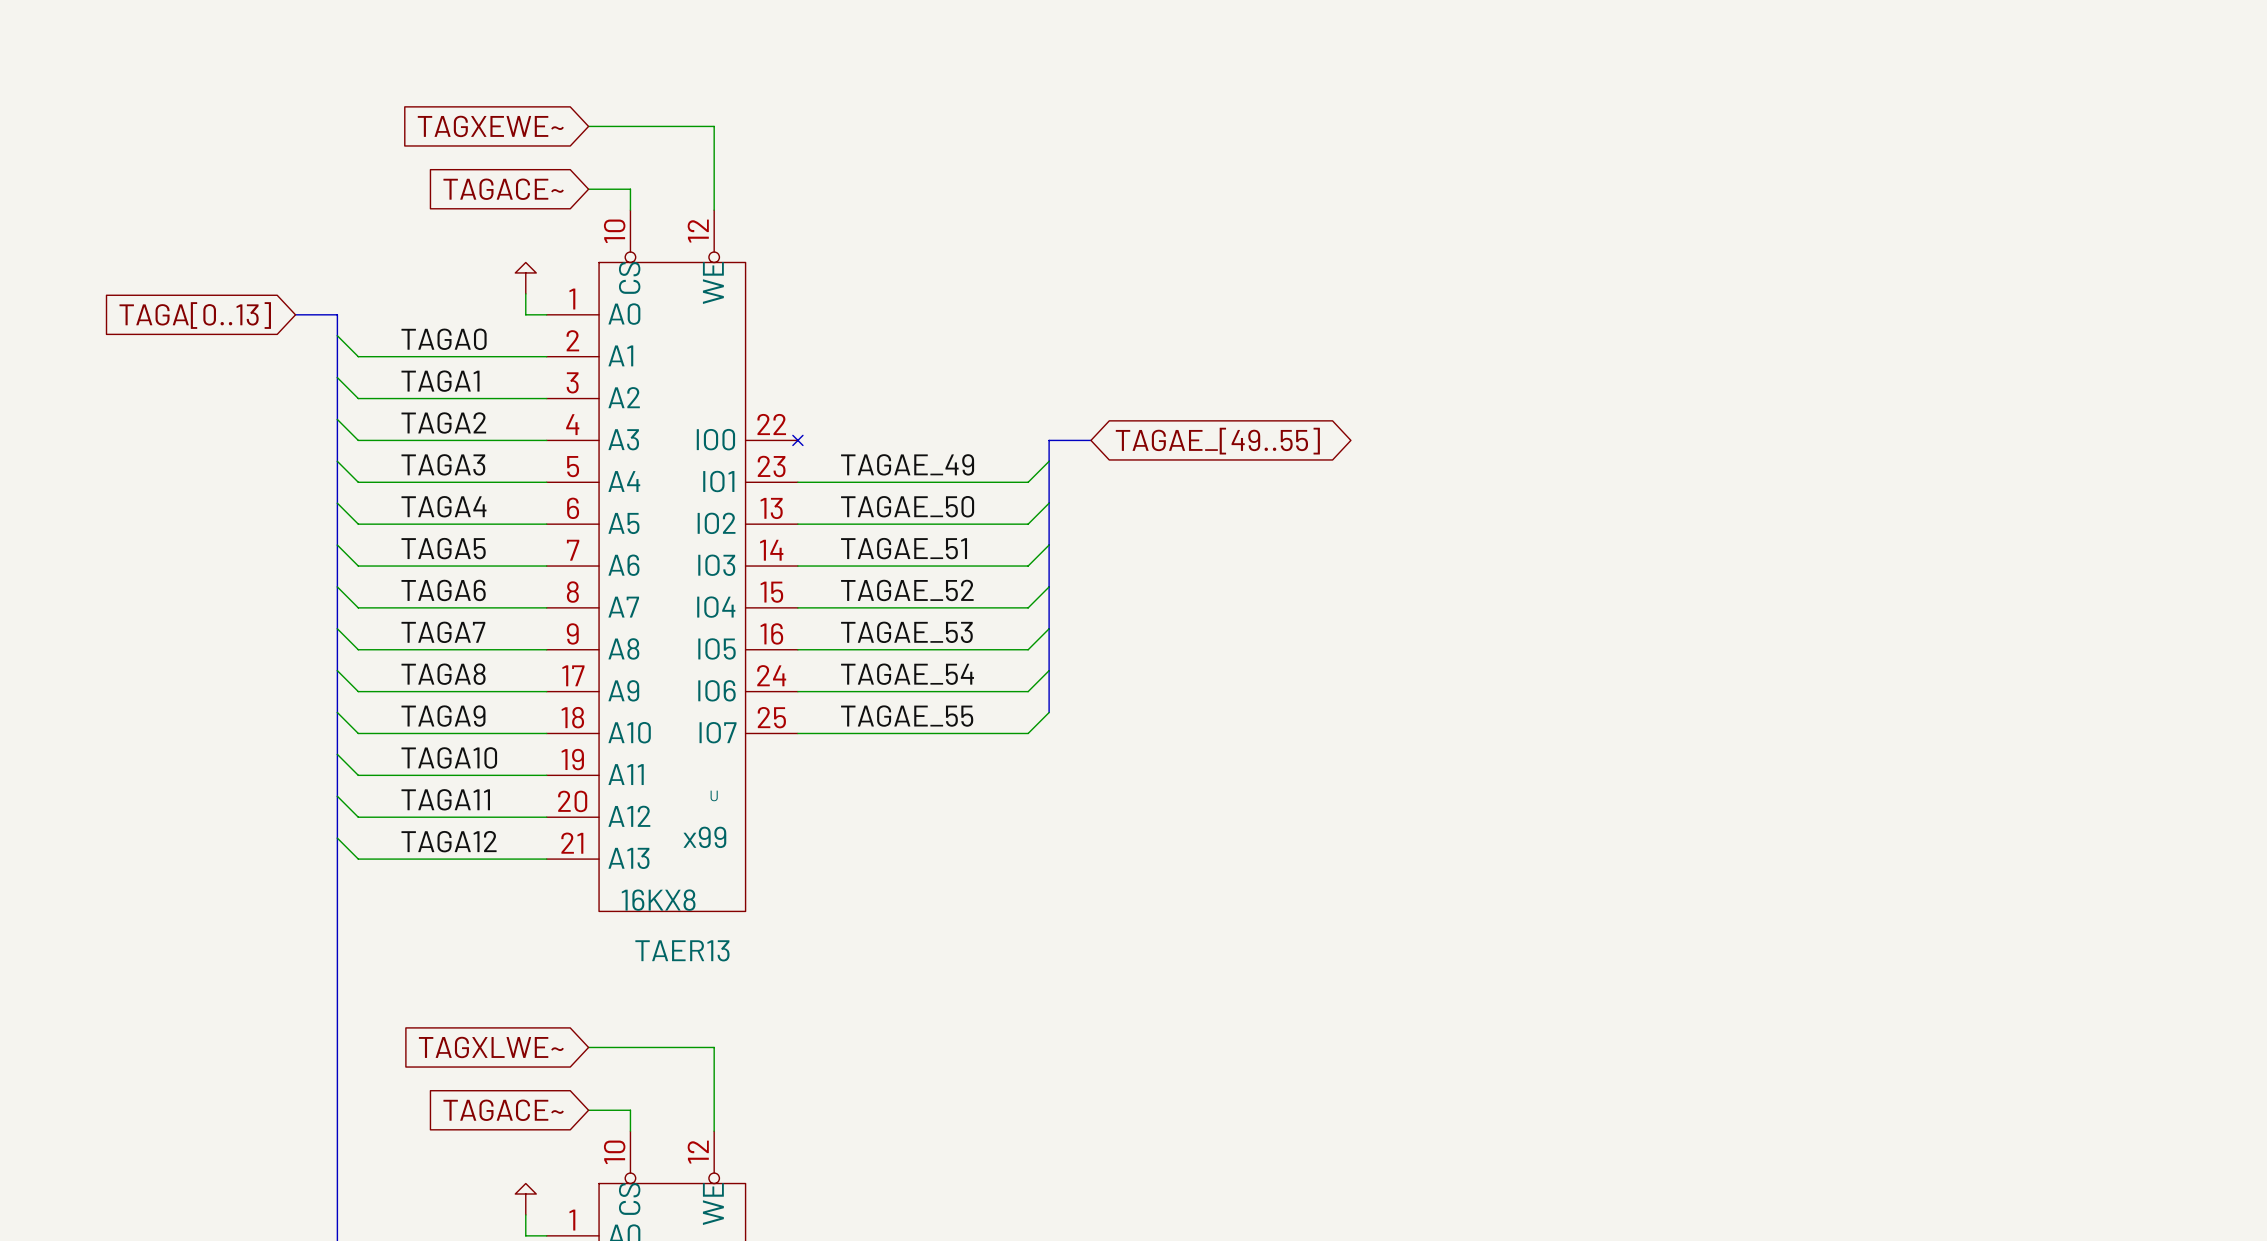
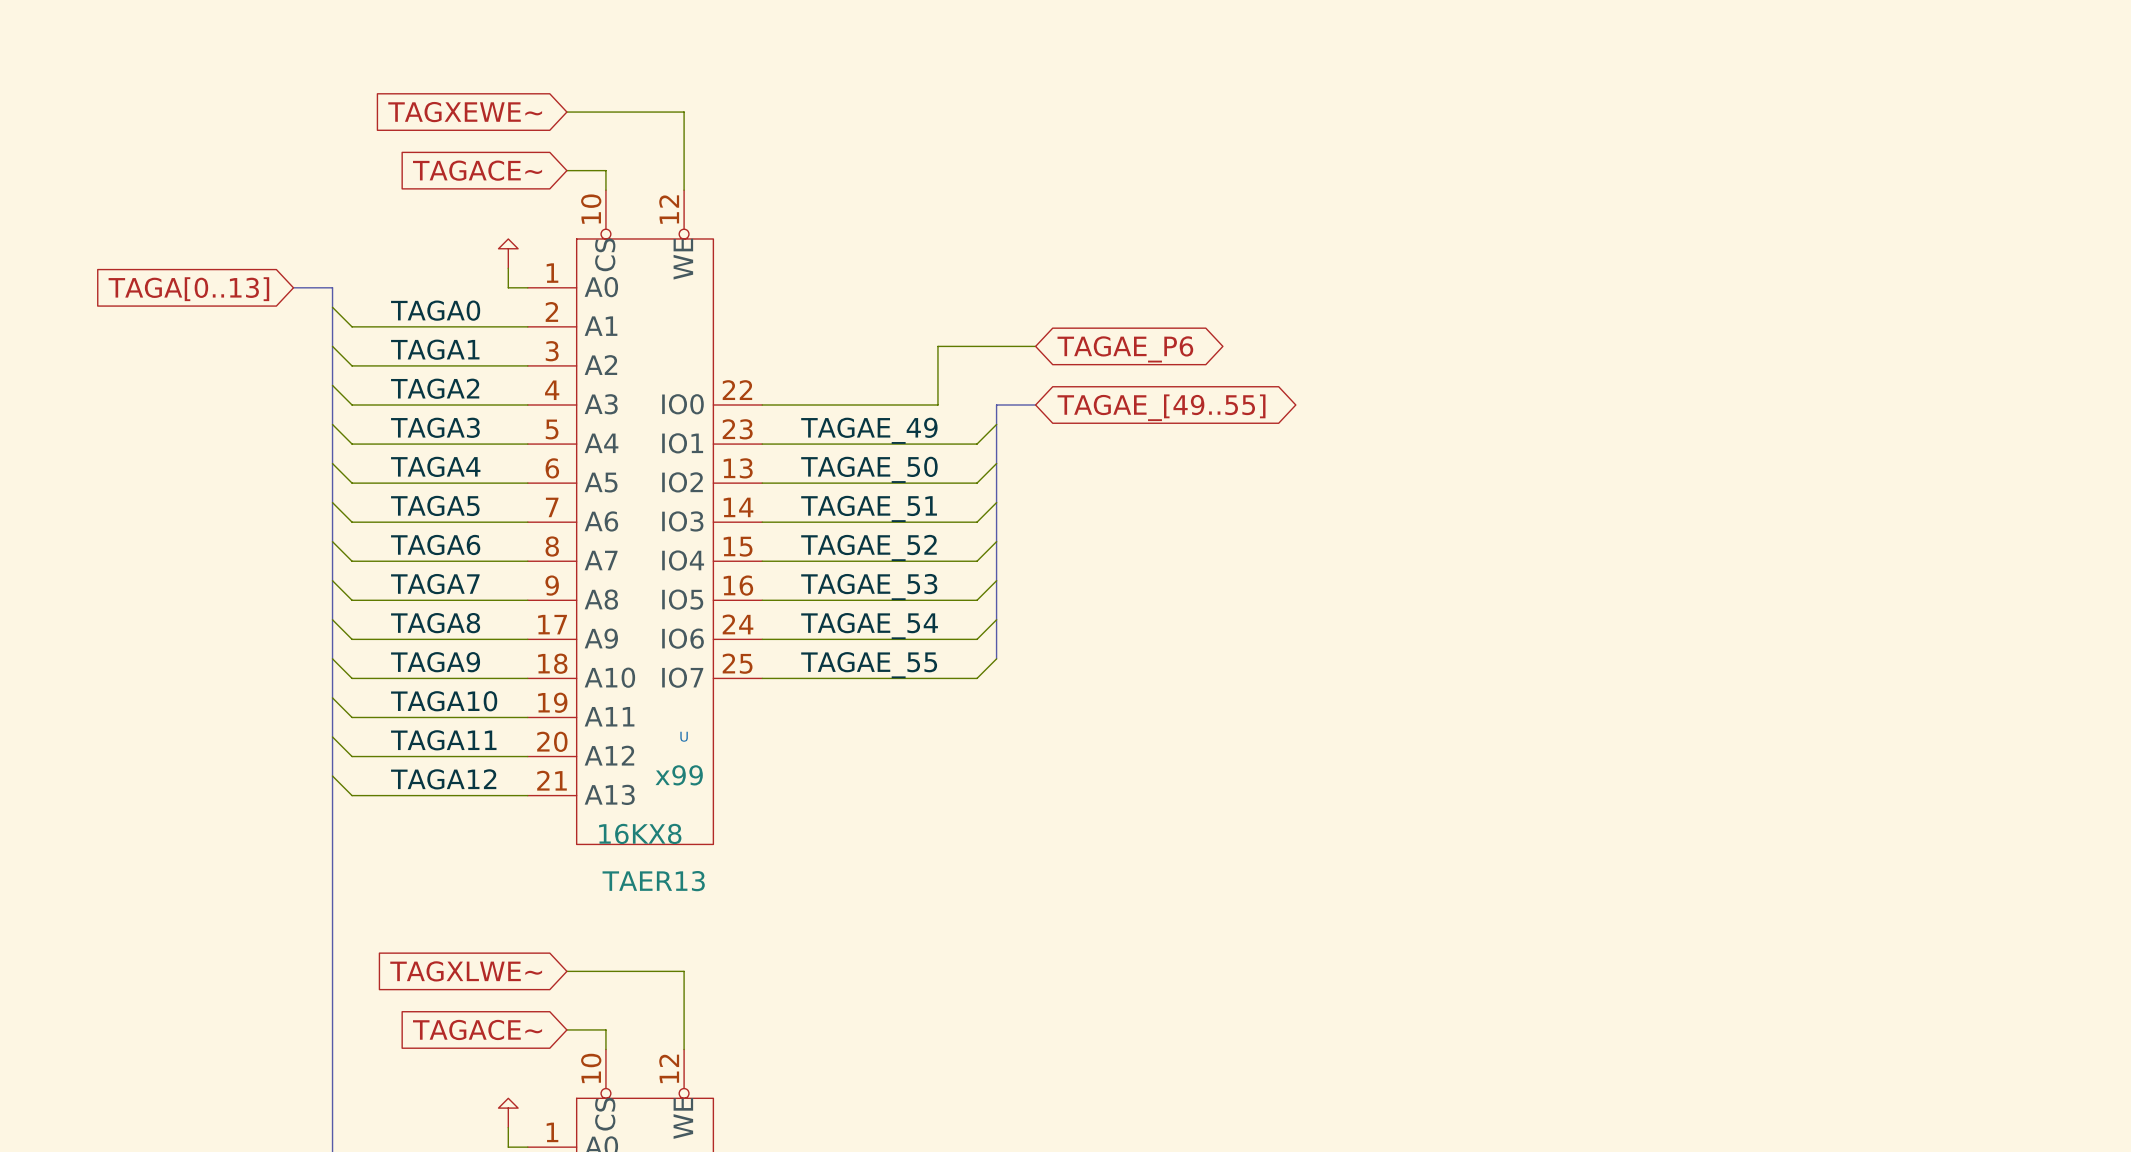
wire: none -> (1035, 346) (937, 346) (937, 404) (762, 404)
global label: none -> TAGAE_P6 (1125, 349)
no-connect mark: (797, 440) -> none

